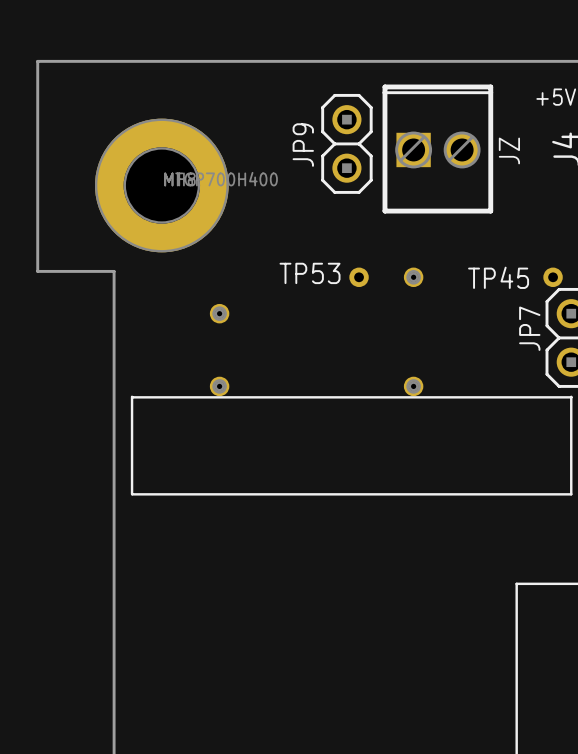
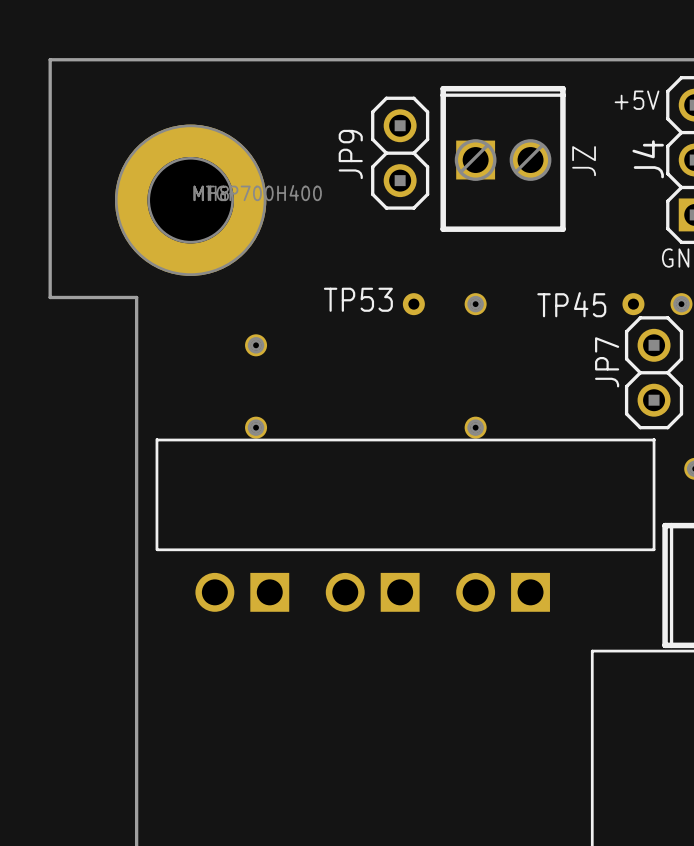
part: none -> (242, 592)
part: none -> (372, 592)
part: none -> (503, 592)

